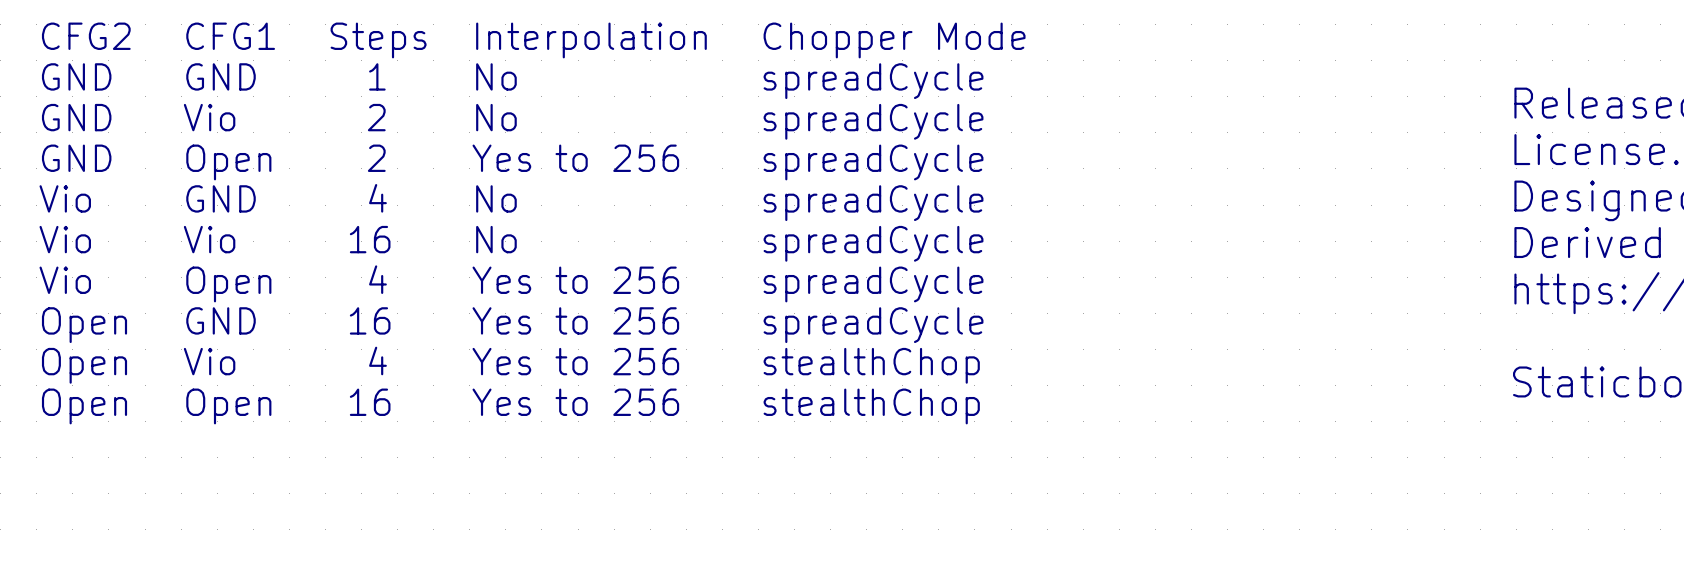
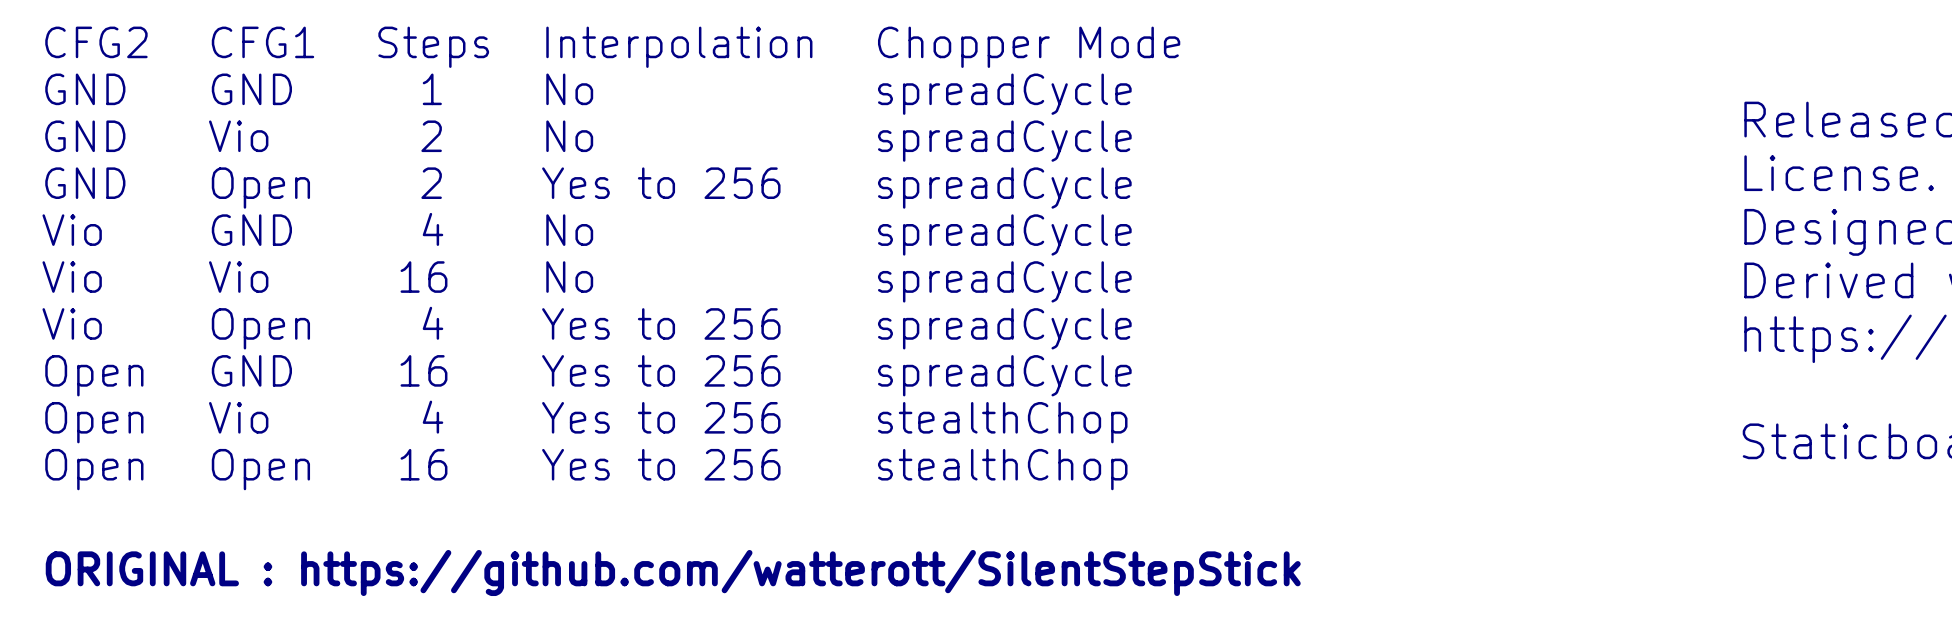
text: none -> ORIGINAL : https://github.com/watterott/SilentStepStick (673, 572)

